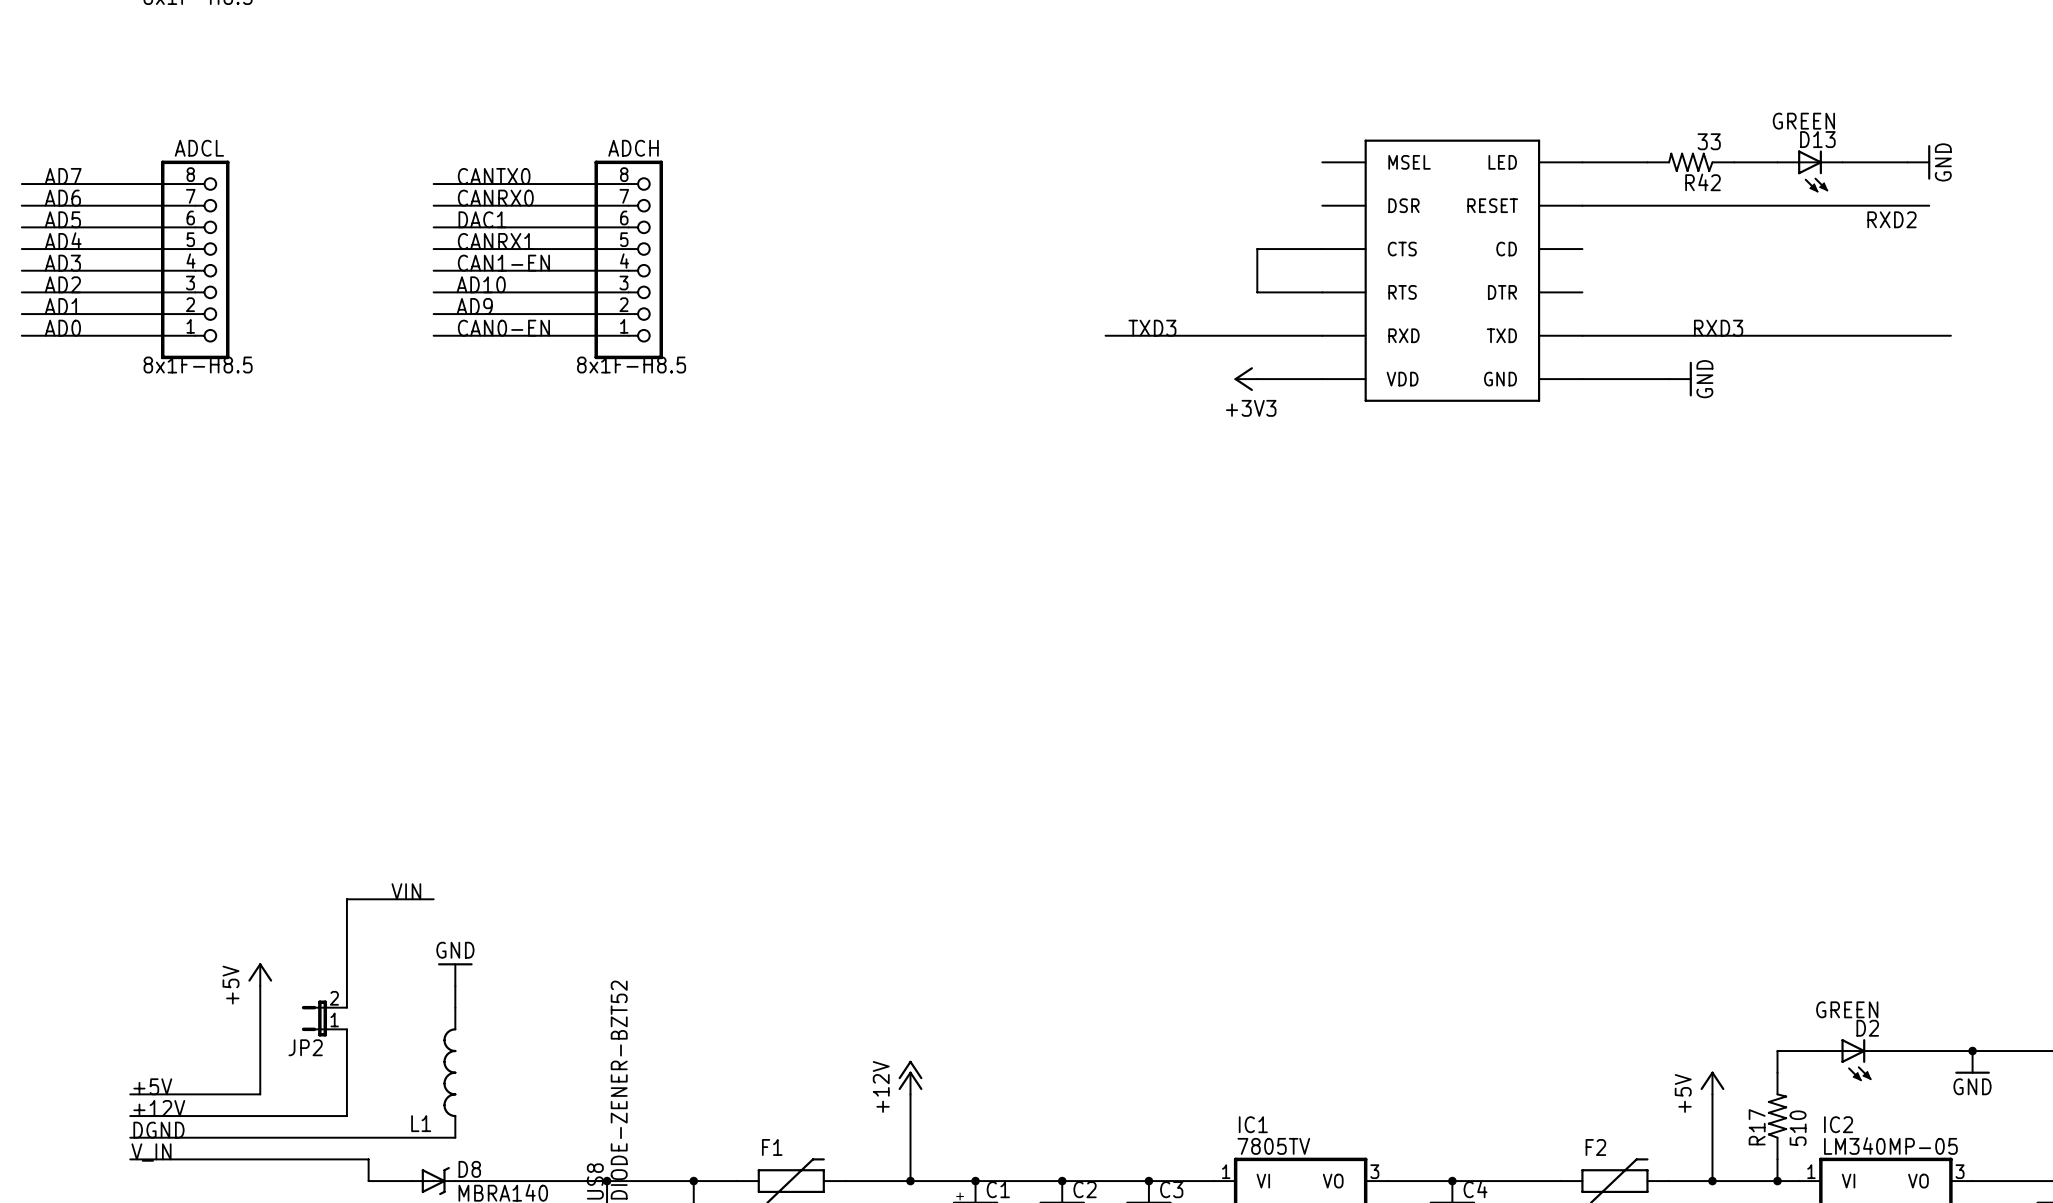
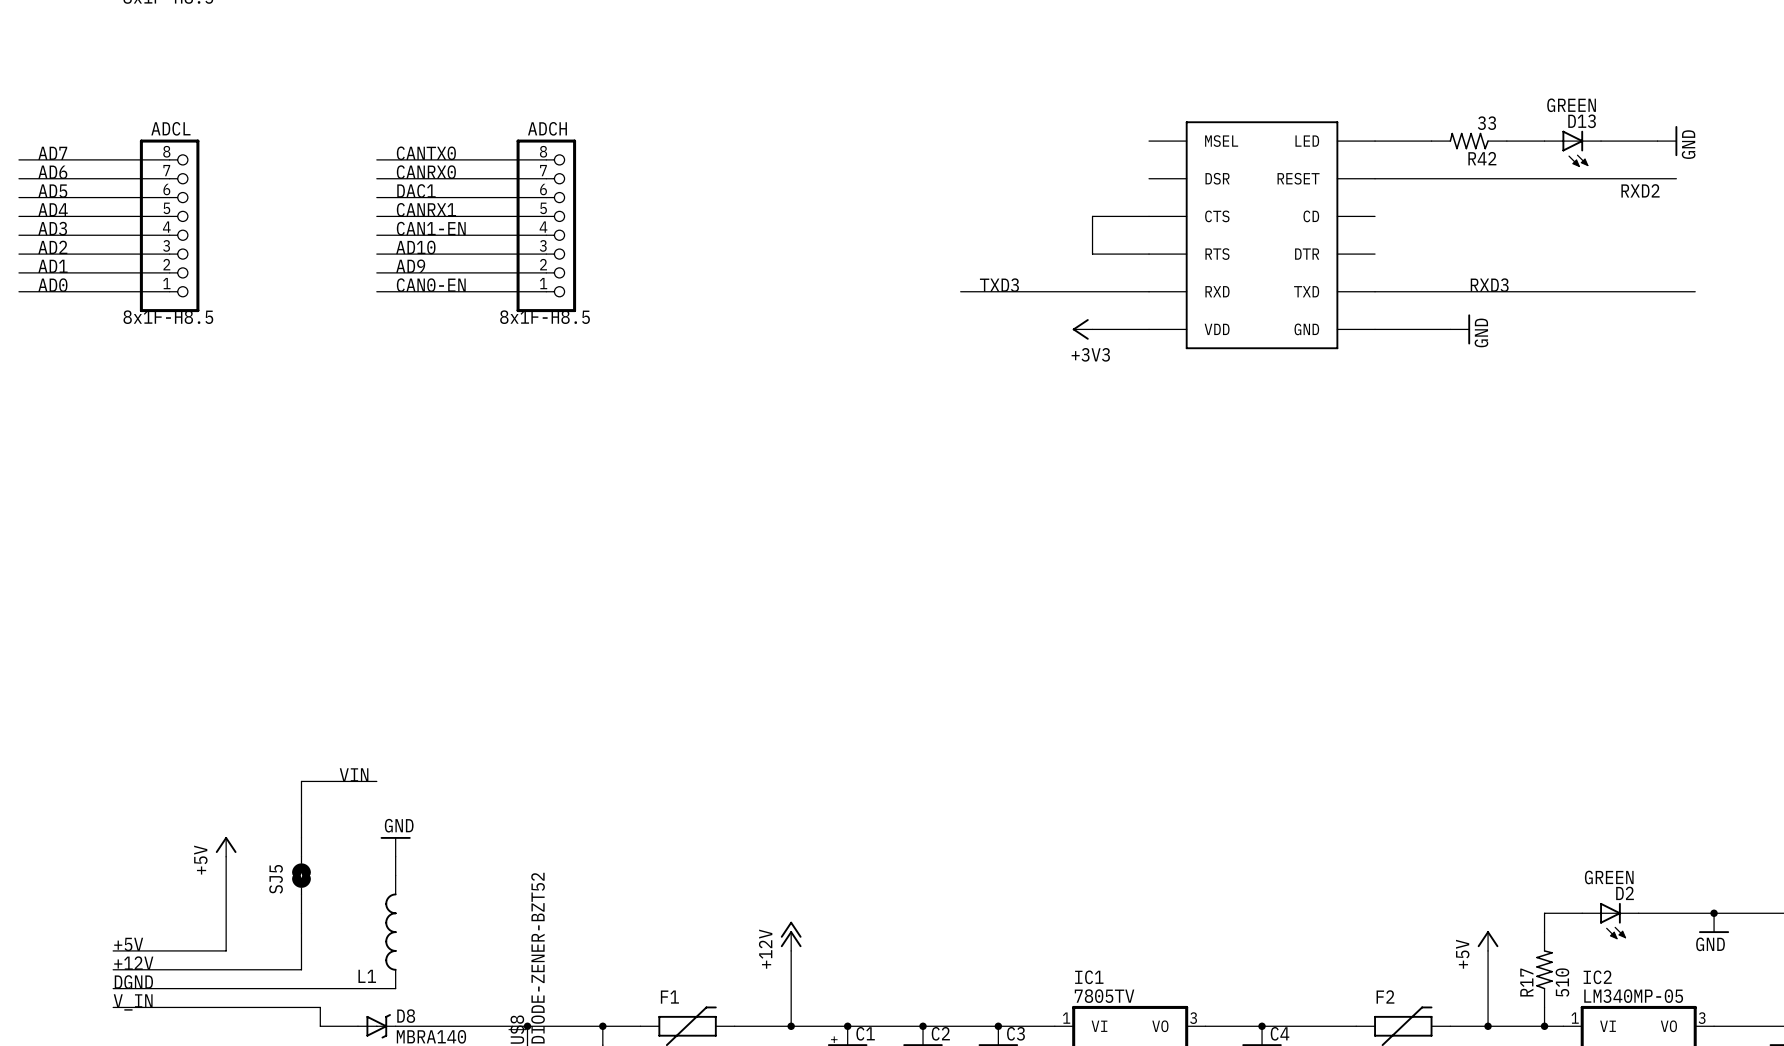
SJ5: none -> (301, 875)
JP2: (324, 1018) -> none

